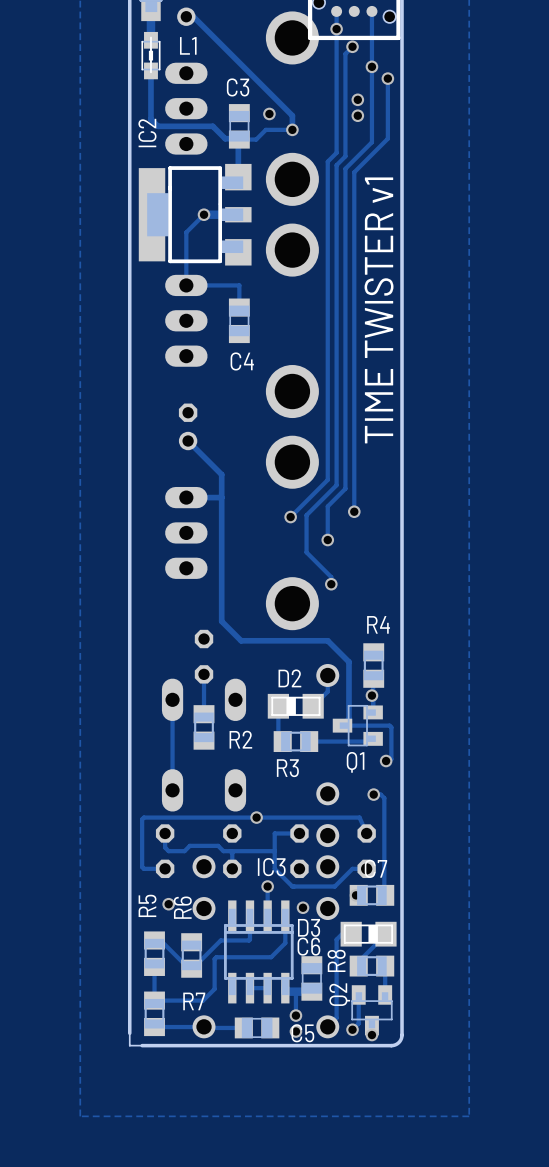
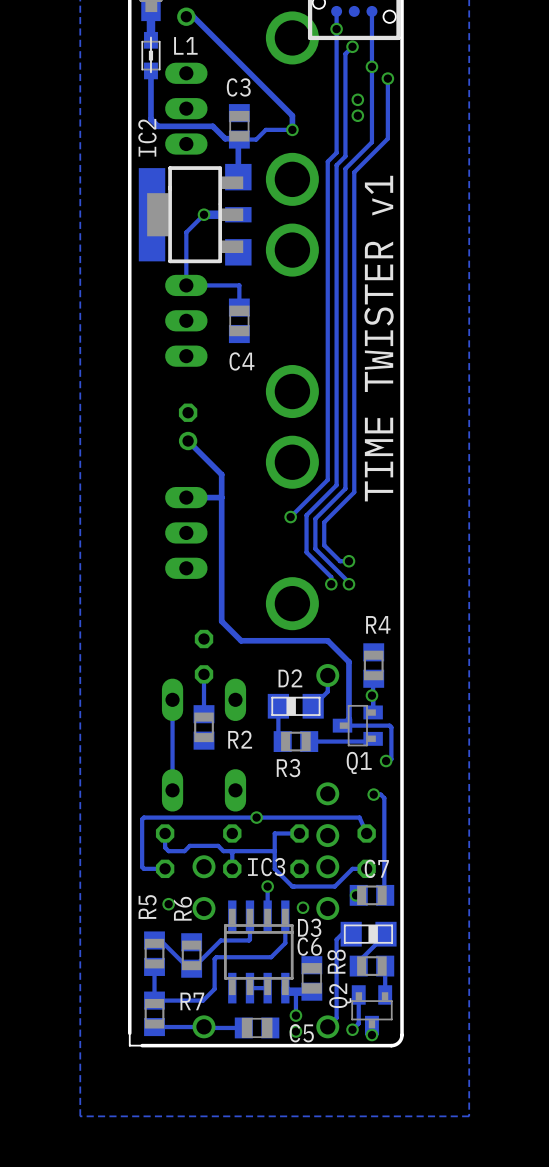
via: (269, 113) -> none
track: (354, 492) (354, 511) -> (354, 492) (324, 522) (324, 545) (340, 561) (348, 561)
track: (327, 506) (327, 540) -> (327, 506) (315, 518) (315, 548) (348, 584)
via: (354, 511) -> none
via: (327, 540) -> none
via: none -> (348, 561)
via: none -> (348, 584)

